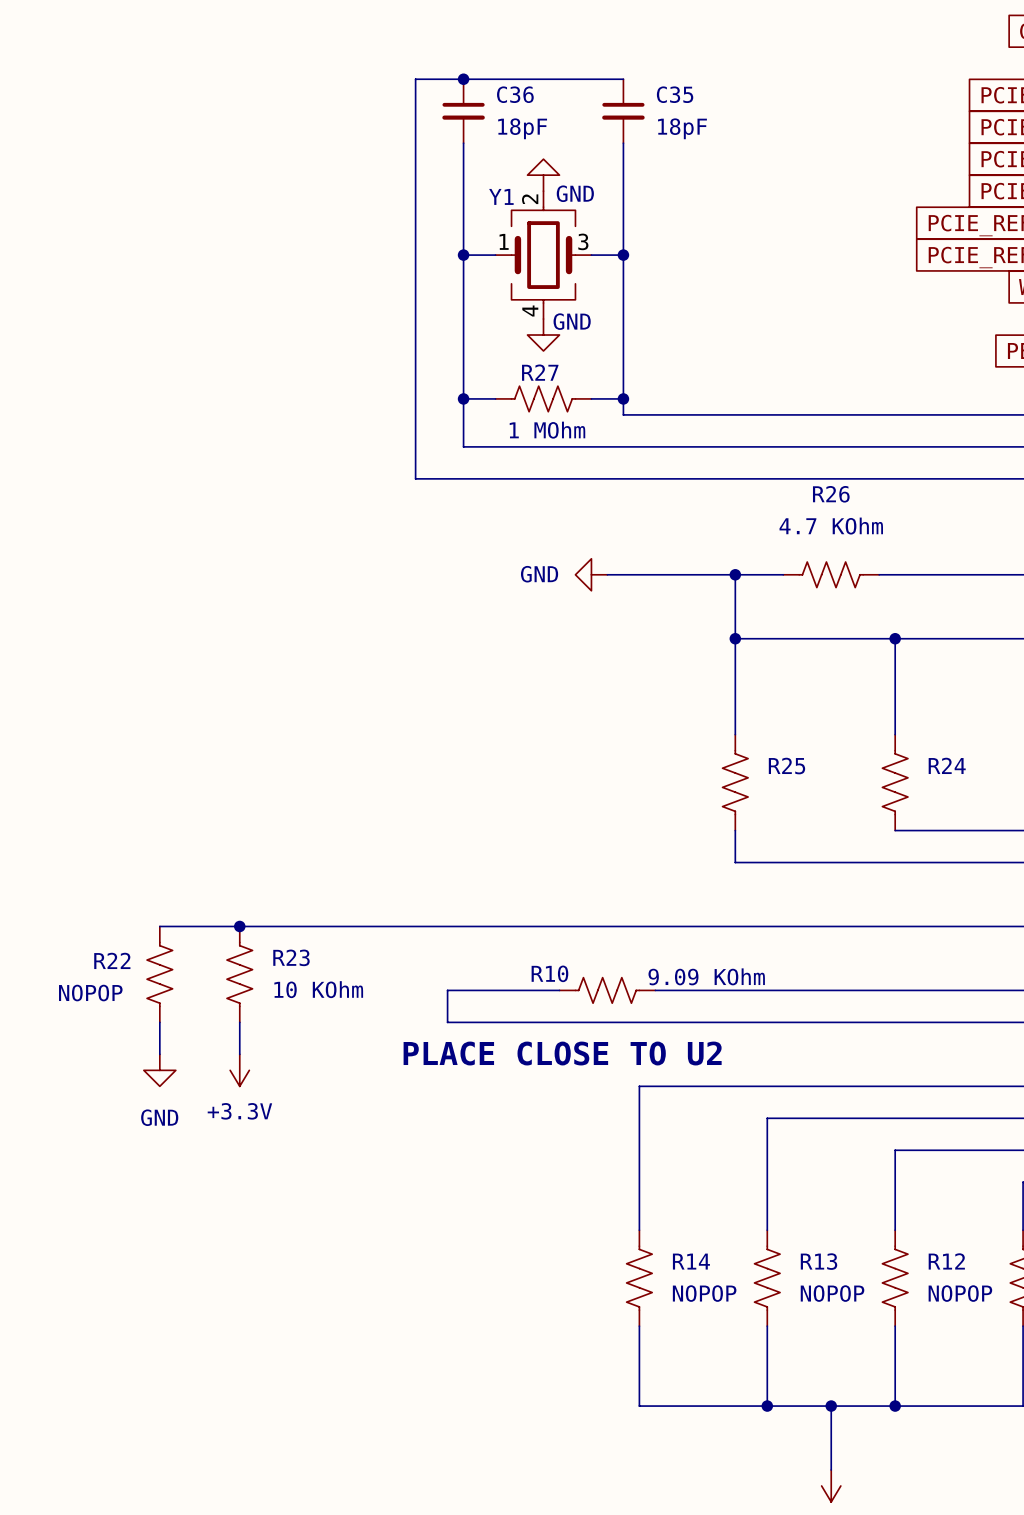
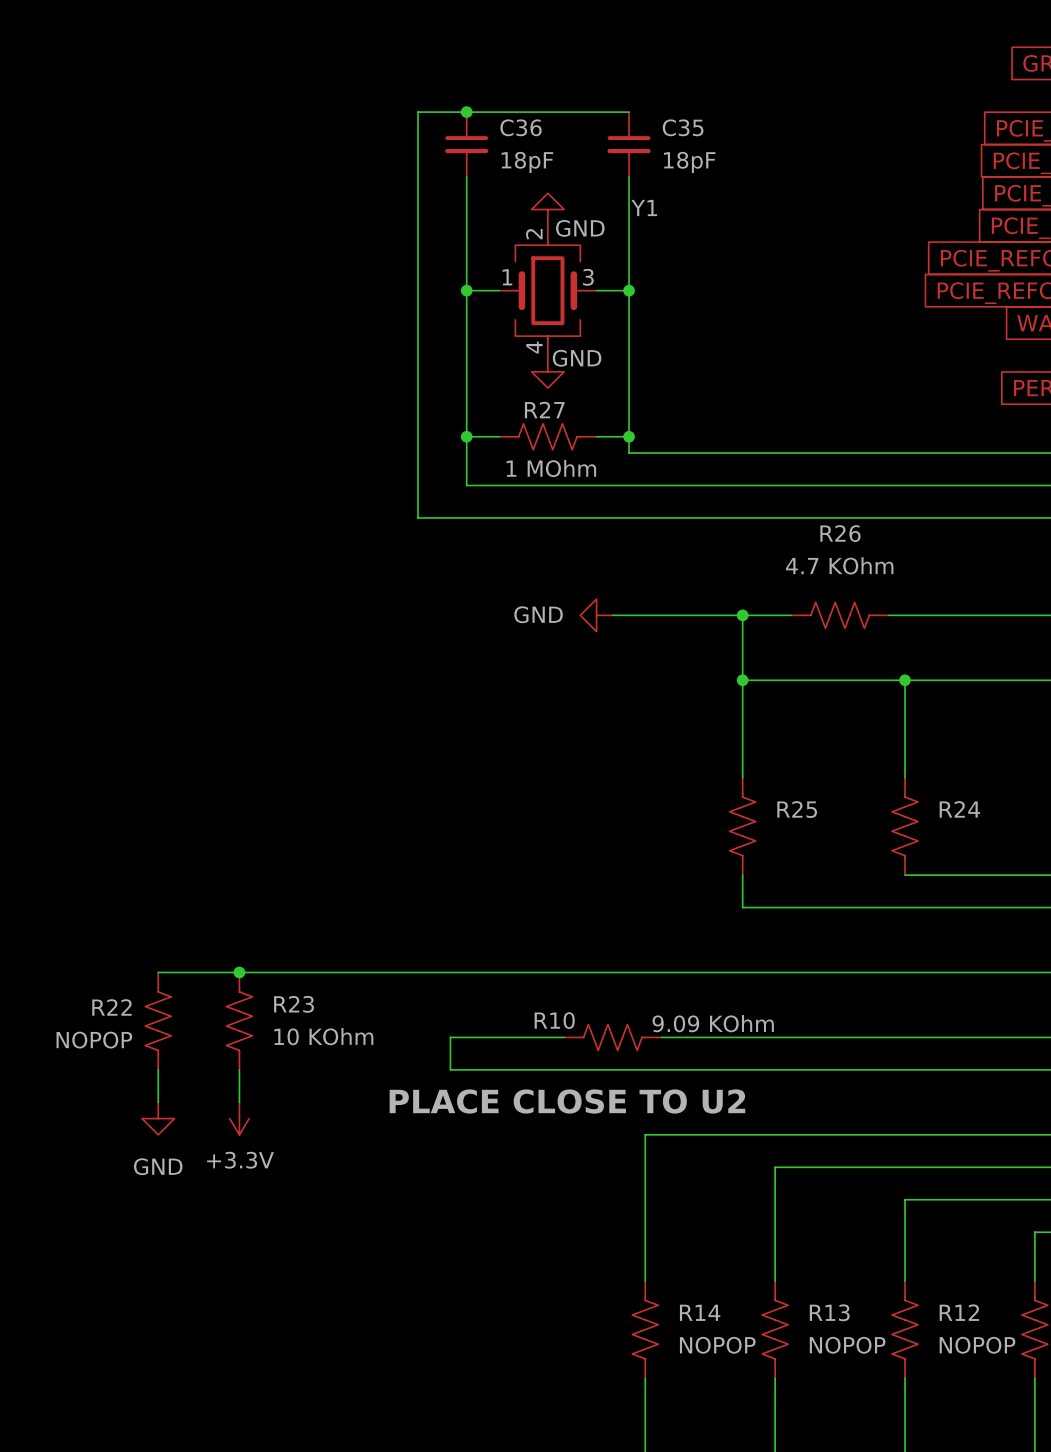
Y1 name position: Y1 (501, 196) -> Y1 (644, 208)

